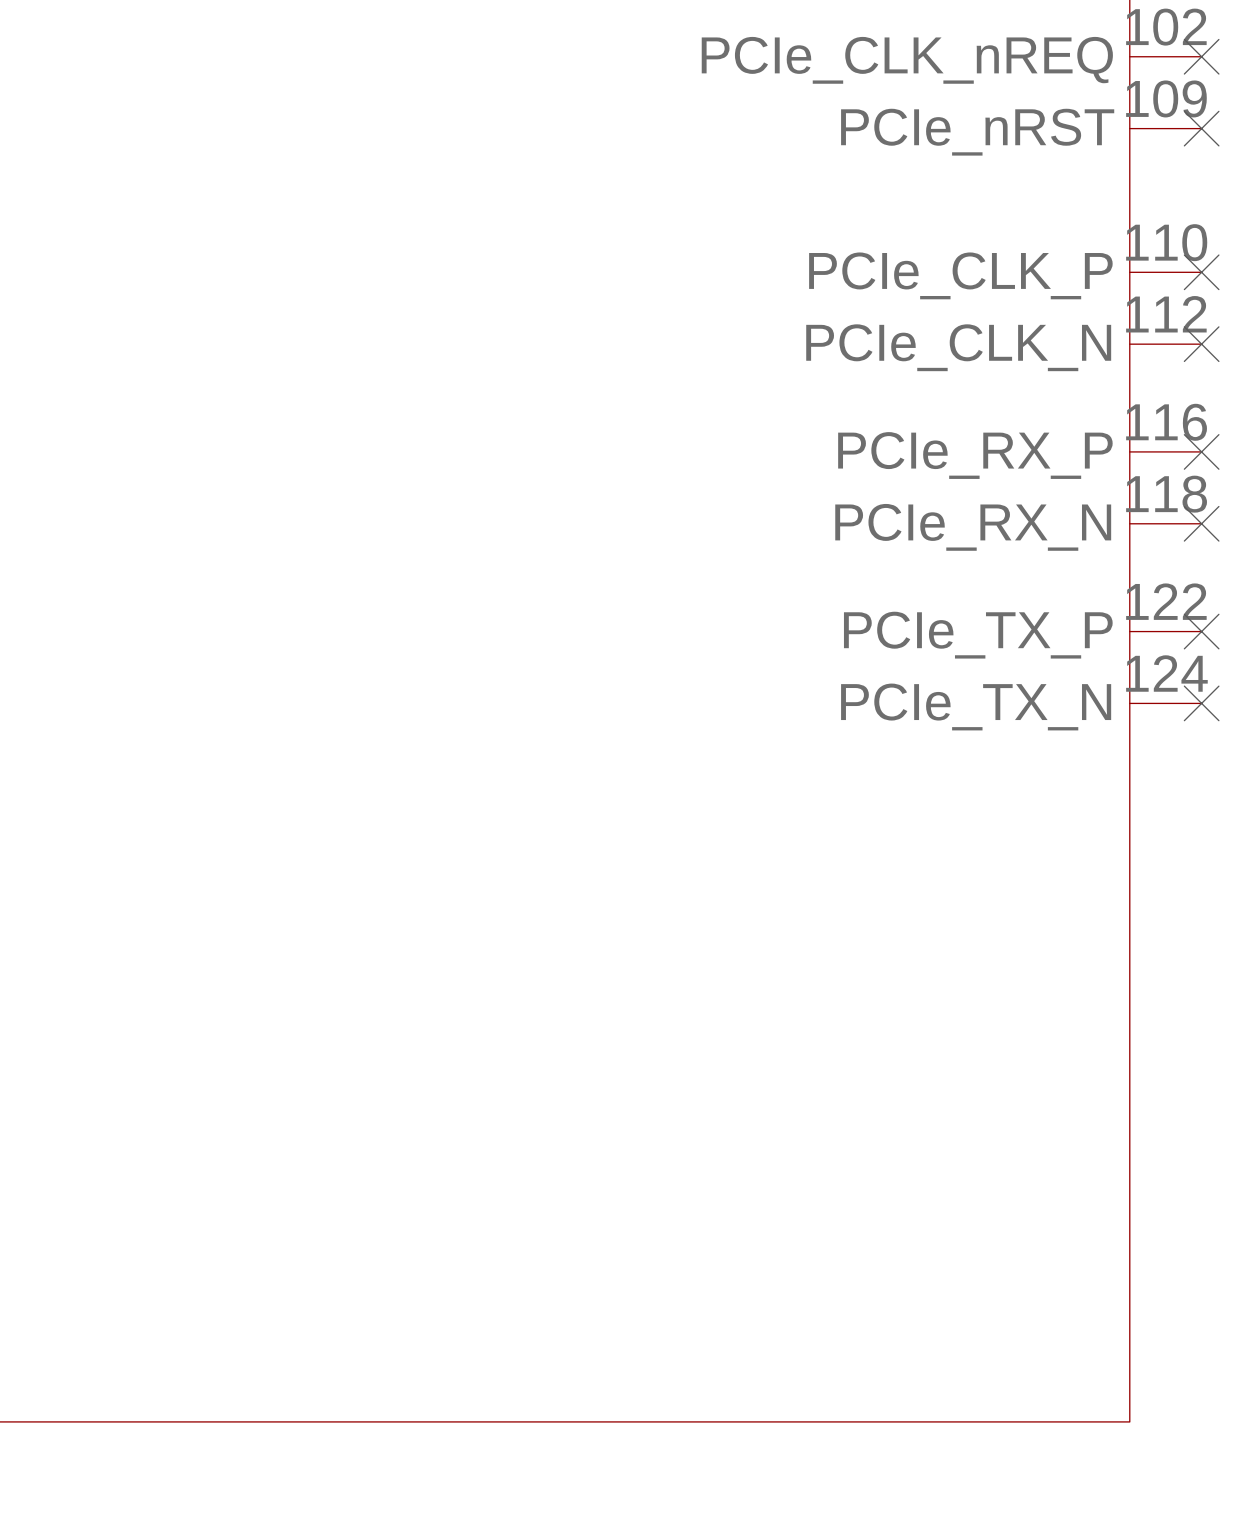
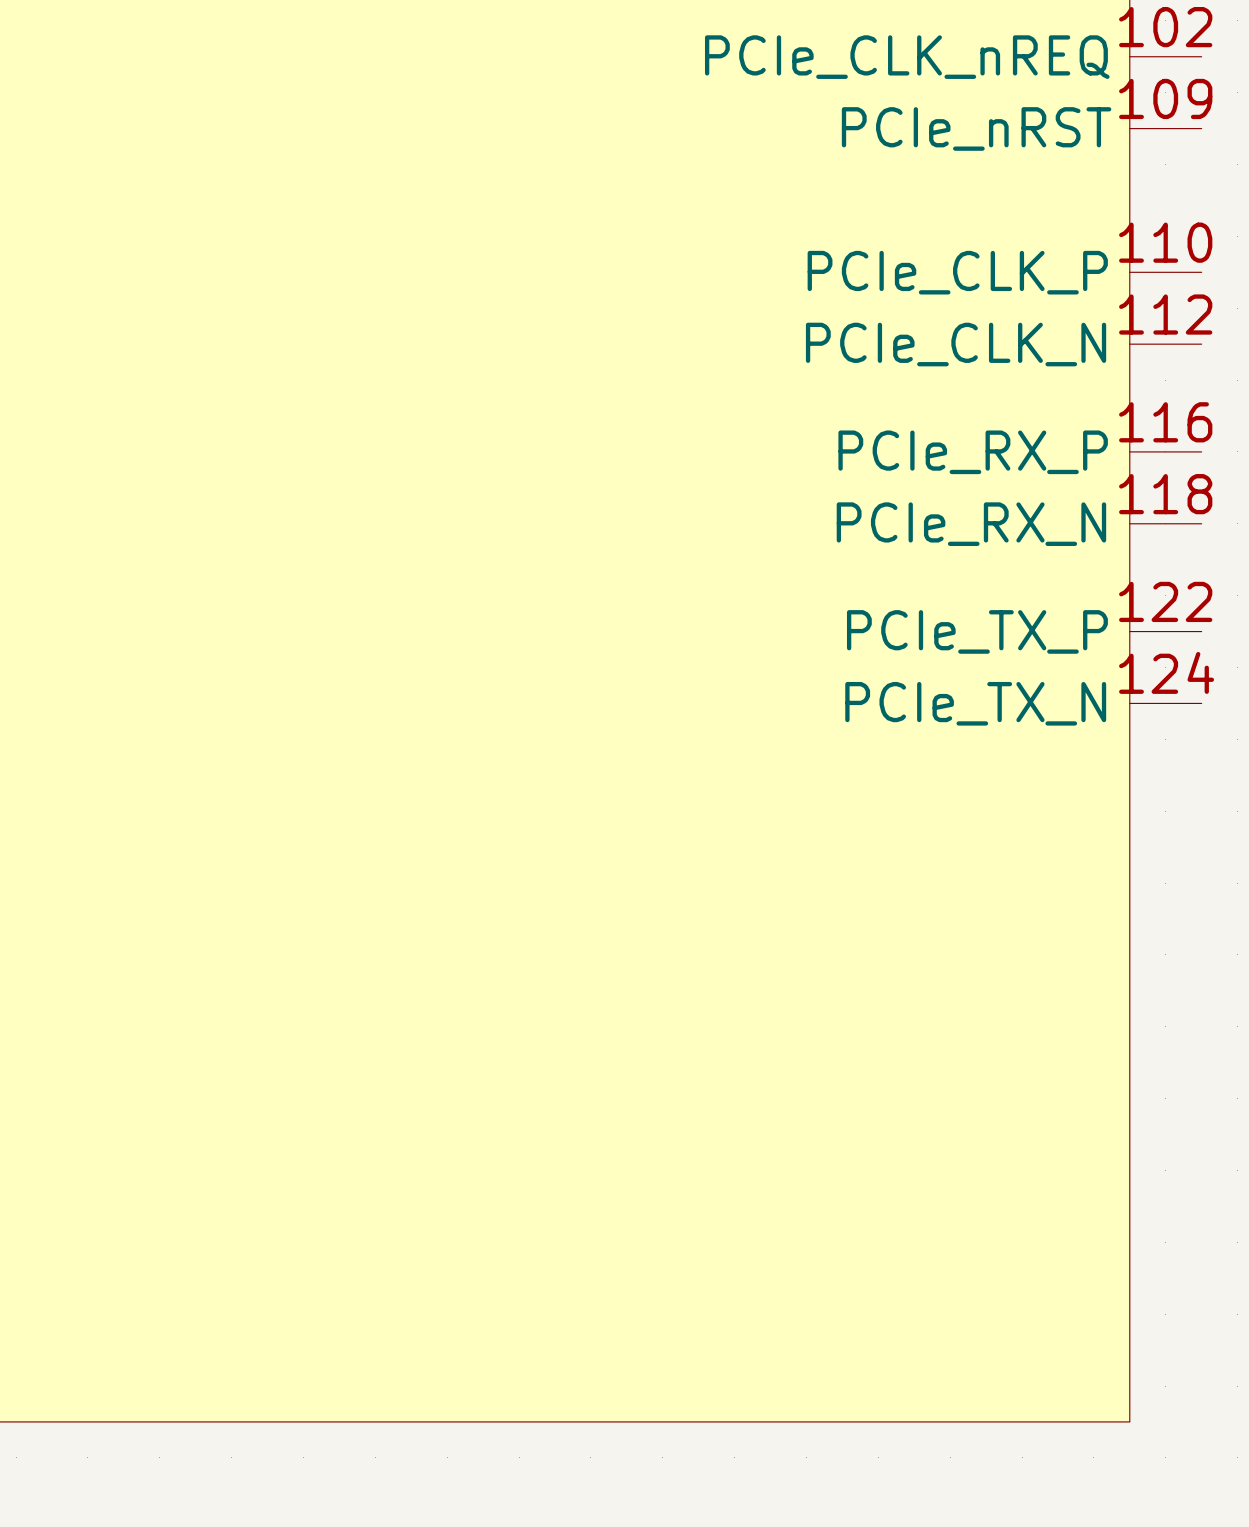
no-connect mark: (1201, 56) -> none
no-connect mark: (1201, 128) -> none
no-connect mark: (1201, 272) -> none
no-connect mark: (1201, 344) -> none
no-connect mark: (1201, 451) -> none
no-connect mark: (1201, 523) -> none
no-connect mark: (1201, 631) -> none
no-connect mark: (1201, 703) -> none

